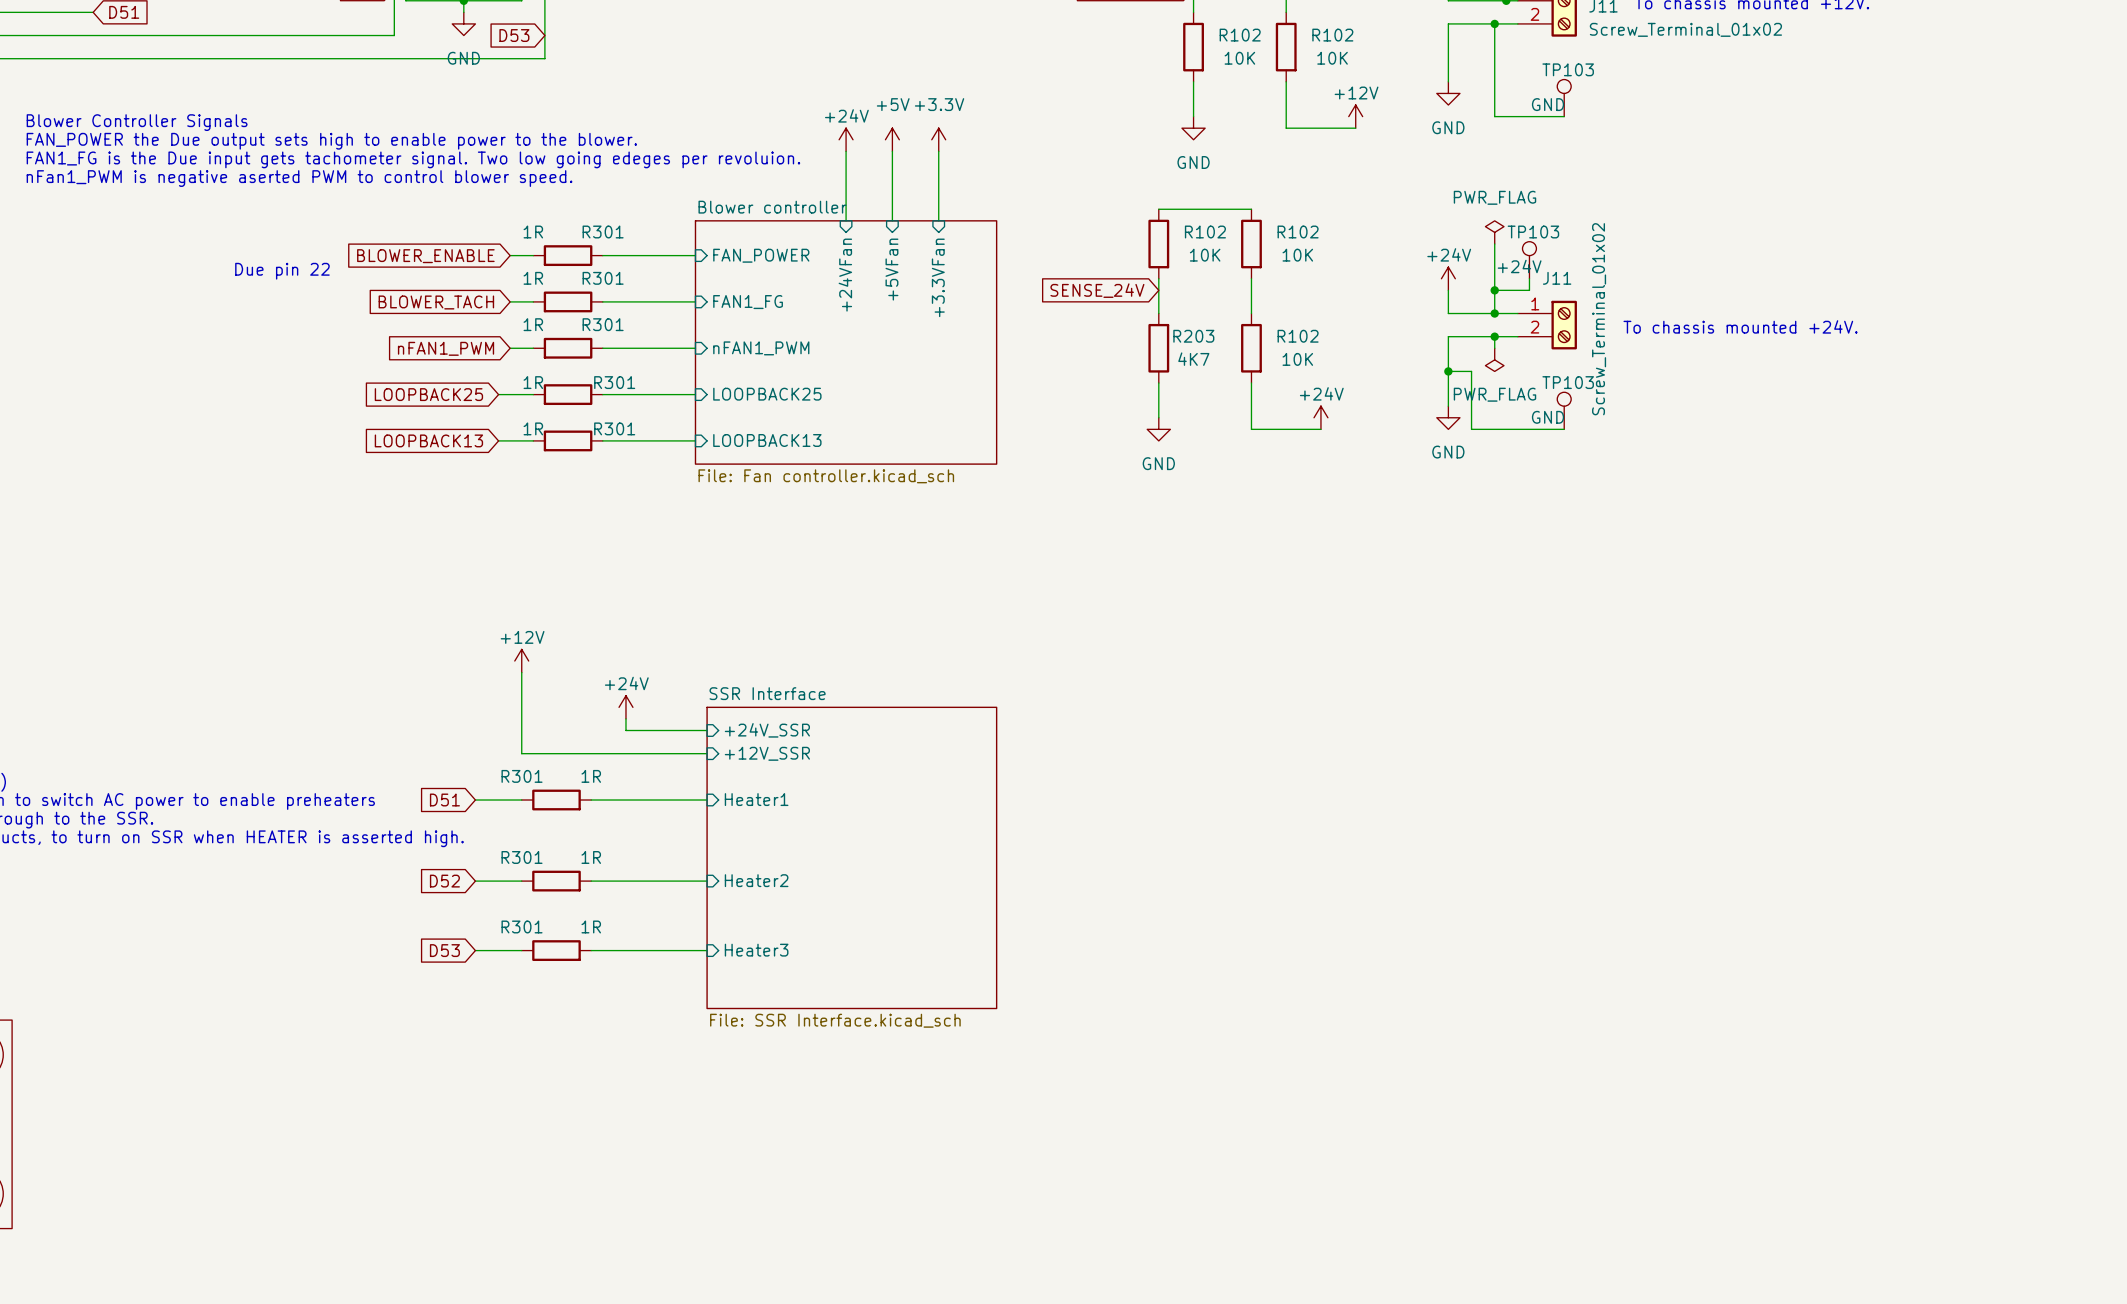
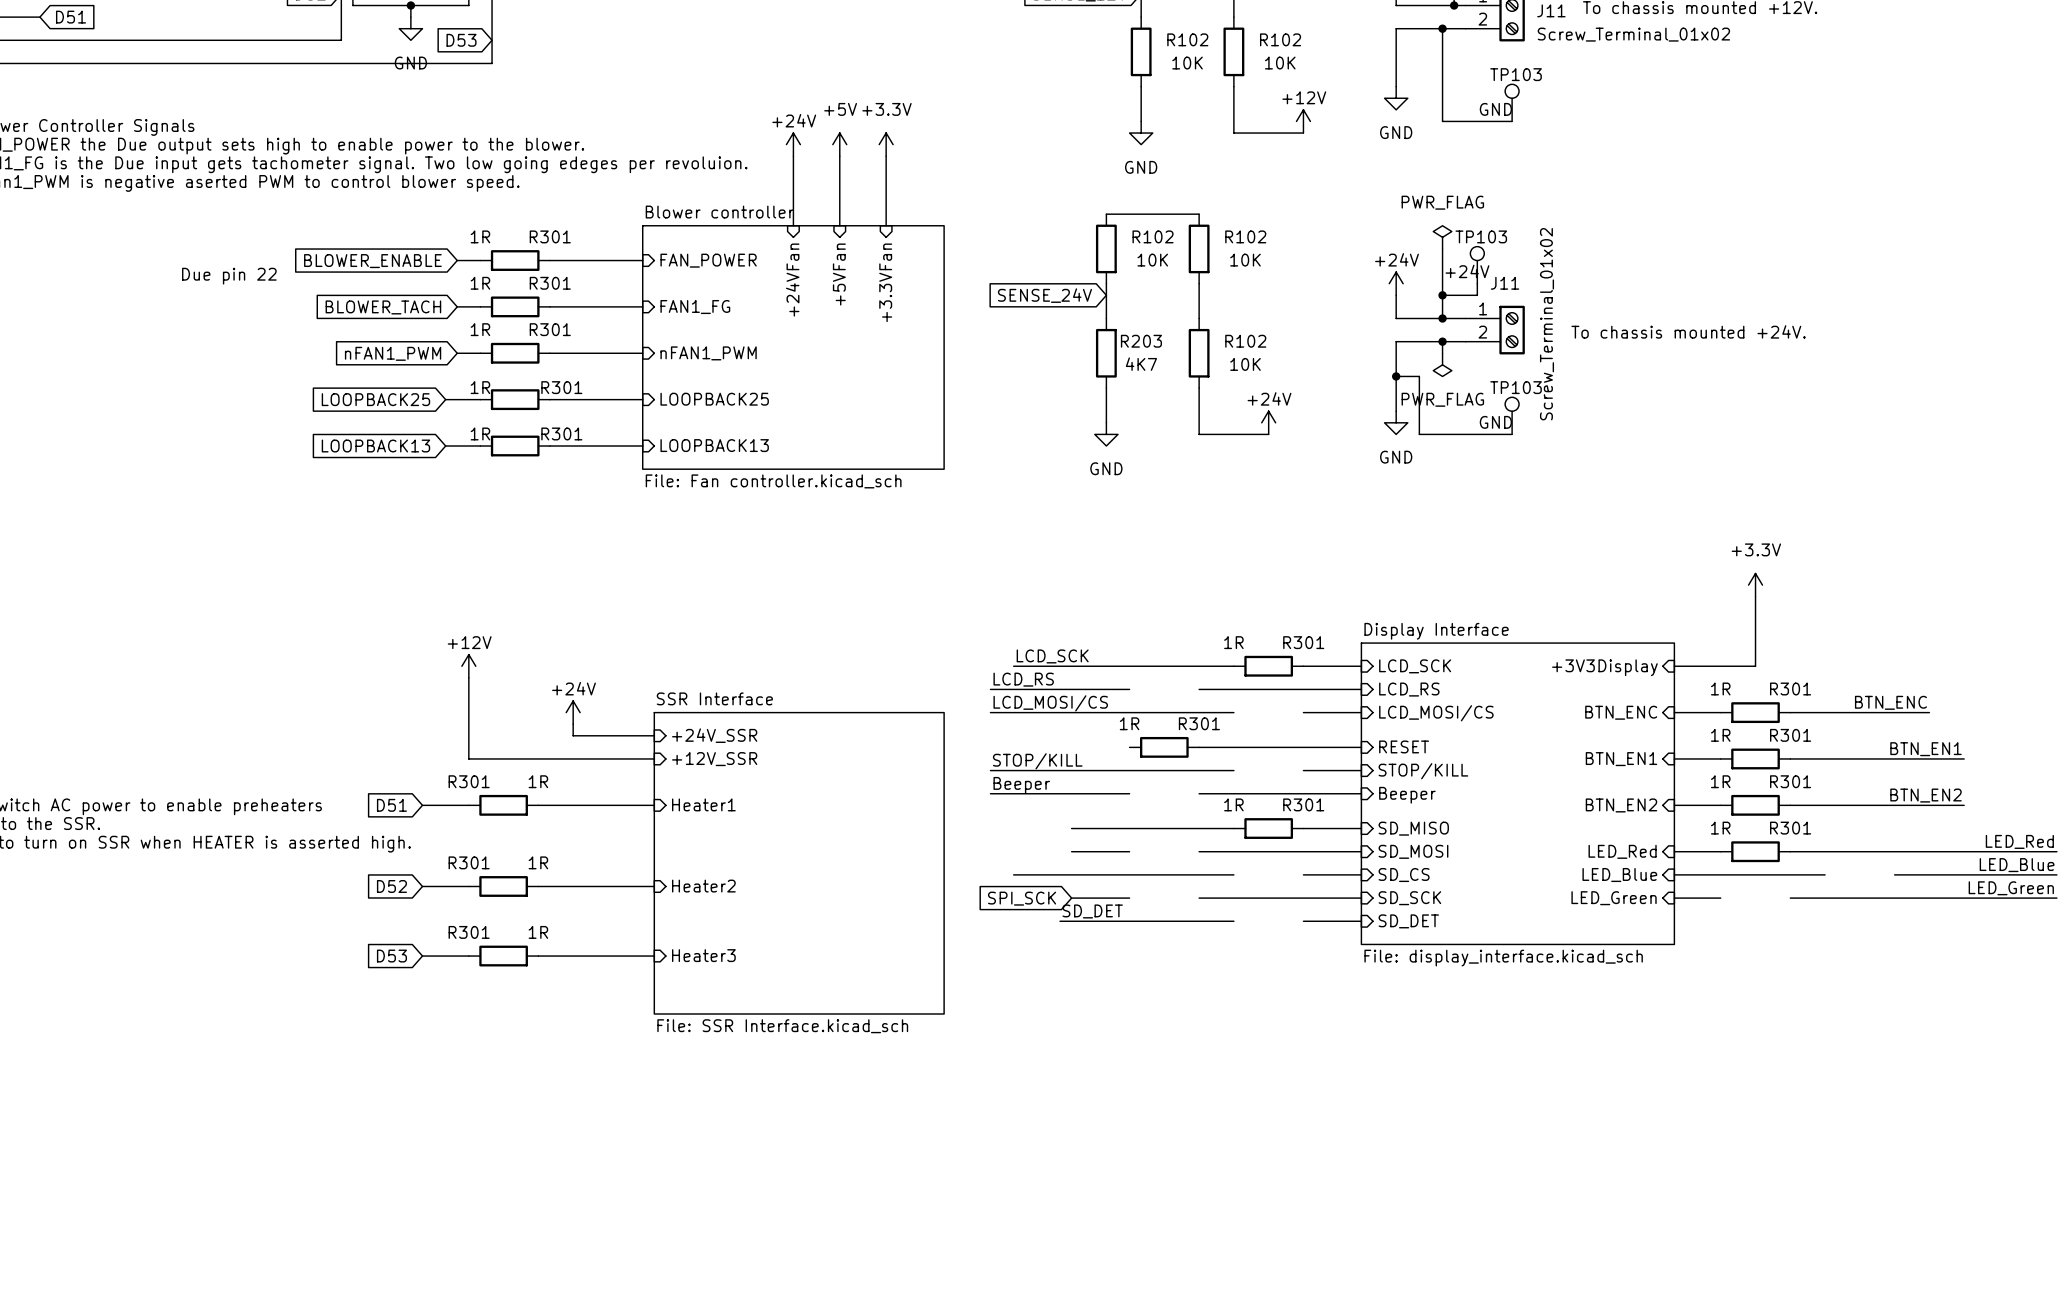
power symbol: none -> +3.3V (1755, 585)
wire: none -> (1755, 596) (1755, 666) (1674, 666)
label: none -> LCD_SCK (1052, 656)
wire: none -> (1013, 666) (1233, 666)
R301: none -> 1R (1268, 666)
wire: none -> (1303, 666) (1361, 666)
sheet pin: none -> LCD_SCK (1415, 666)
sheet pin: none -> +3V3Display (1604, 667)
label: none -> LCD_RS (1023, 679)
wire: none -> (990, 689) (1129, 689)
wire: none -> (1199, 689) (1361, 689)
sheet pin: none -> LCD_RS (1409, 689)
label: none -> BTN_ENC (1890, 702)
label: none -> LCD_MOSI/CS (1050, 703)
wire: none -> (990, 712) (1233, 712)
wire: none -> (1303, 712) (1361, 712)
sheet pin: none -> BTN_ENC (1621, 712)
wire: none -> (1674, 712) (1720, 712)
R301: none -> 1R (1755, 712)
wire: none -> (1790, 712) (1929, 712)
sheet pin: none -> LCD_MOSI/CS (1436, 713)
sheet pin: none -> RESET (1404, 746)
R301: none -> 1R (1164, 747)
wire: none -> (1199, 747) (1361, 747)
label: none -> BTN_EN1 (1926, 749)
sheet pin: none -> BTN_EN1 (1621, 759)
wire: none -> (1674, 758) (1720, 758)
R301: none -> 1R (1755, 758)
wire: none -> (1790, 758) (1964, 758)
label: none -> STOP/KILL (1037, 761)
wire: none -> (990, 770) (1233, 770)
wire: none -> (1303, 770) (1361, 770)
sheet pin: none -> STOP/KILL (1423, 771)
label: none -> Beeper (1021, 785)
wire: none -> (990, 793) (1129, 793)
wire: none -> (1199, 793) (1361, 793)
sheet Display Interface: none -> File: display_interface.kicad_sch (1517, 793)
sheet pin: none -> Beeper (1407, 795)
label: none -> BTN_EN2 (1926, 795)
sheet pin: none -> BTN_EN2 (1621, 805)
wire: none -> (1674, 805) (1720, 805)
R301: none -> 1R (1755, 805)
wire: none -> (1790, 805) (1964, 805)
wire: none -> (1071, 828) (1233, 828)
R301: none -> 1R (1268, 828)
wire: none -> (1303, 828) (1361, 828)
sheet pin: none -> SD_MISO (1413, 828)
label: none -> LED_Red (2019, 841)
wire: none -> (1071, 851) (1129, 851)
wire: none -> (1199, 851) (1361, 851)
sheet pin: none -> SD_MOSI (1413, 851)
sheet pin: none -> LED_Red (1622, 851)
wire: none -> (1674, 851) (1720, 851)
R301: none -> 1R (1755, 851)
wire: none -> (1790, 851) (2056, 851)
label: none -> LED_Blue (2017, 865)
wire: none -> (1013, 874) (1233, 874)
wire: none -> (1303, 874) (1361, 874)
sheet pin: none -> SD_CS (1404, 875)
sheet pin: none -> LED_Blue (1619, 875)
wire: none -> (1674, 874) (1825, 874)
wire: none -> (1894, 874) (2056, 874)
label: none -> LED_Green (2011, 888)
wire: none -> (1071, 898) (1129, 898)
wire: none -> (1199, 898) (1361, 898)
sheet pin: none -> SD_SCK (1409, 898)
sheet pin: none -> LED_Green (1614, 898)
wire: none -> (1674, 898) (1720, 898)
wire: none -> (1790, 898) (2056, 898)
global label: none -> SPI_SCK (1022, 898)
label: none -> SD_DET (1092, 911)
wire: none -> (1060, 921) (1233, 921)
wire: none -> (1303, 921) (1361, 921)
sheet pin: none -> SD_DET (1408, 921)

